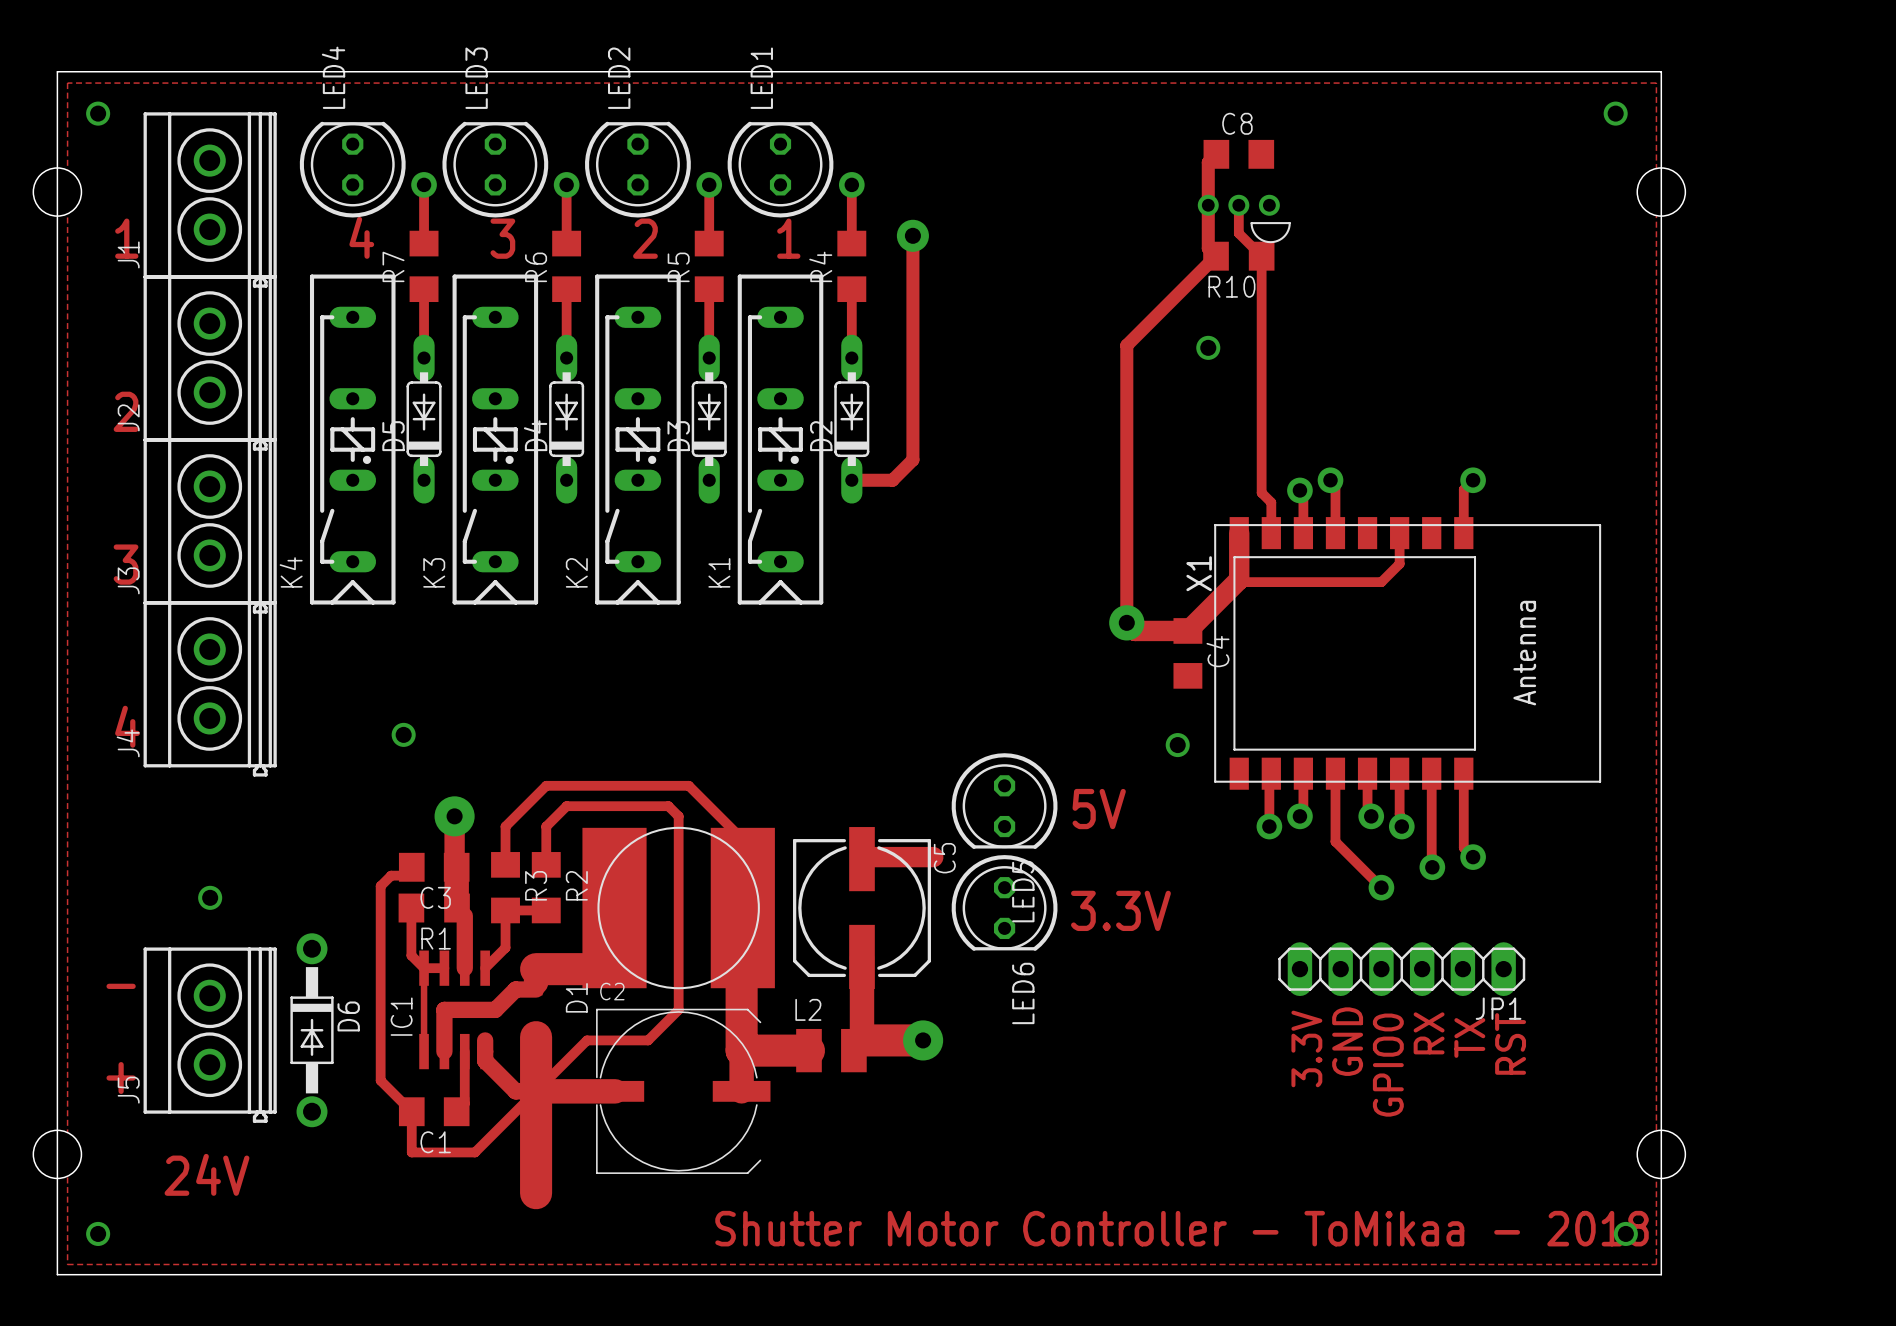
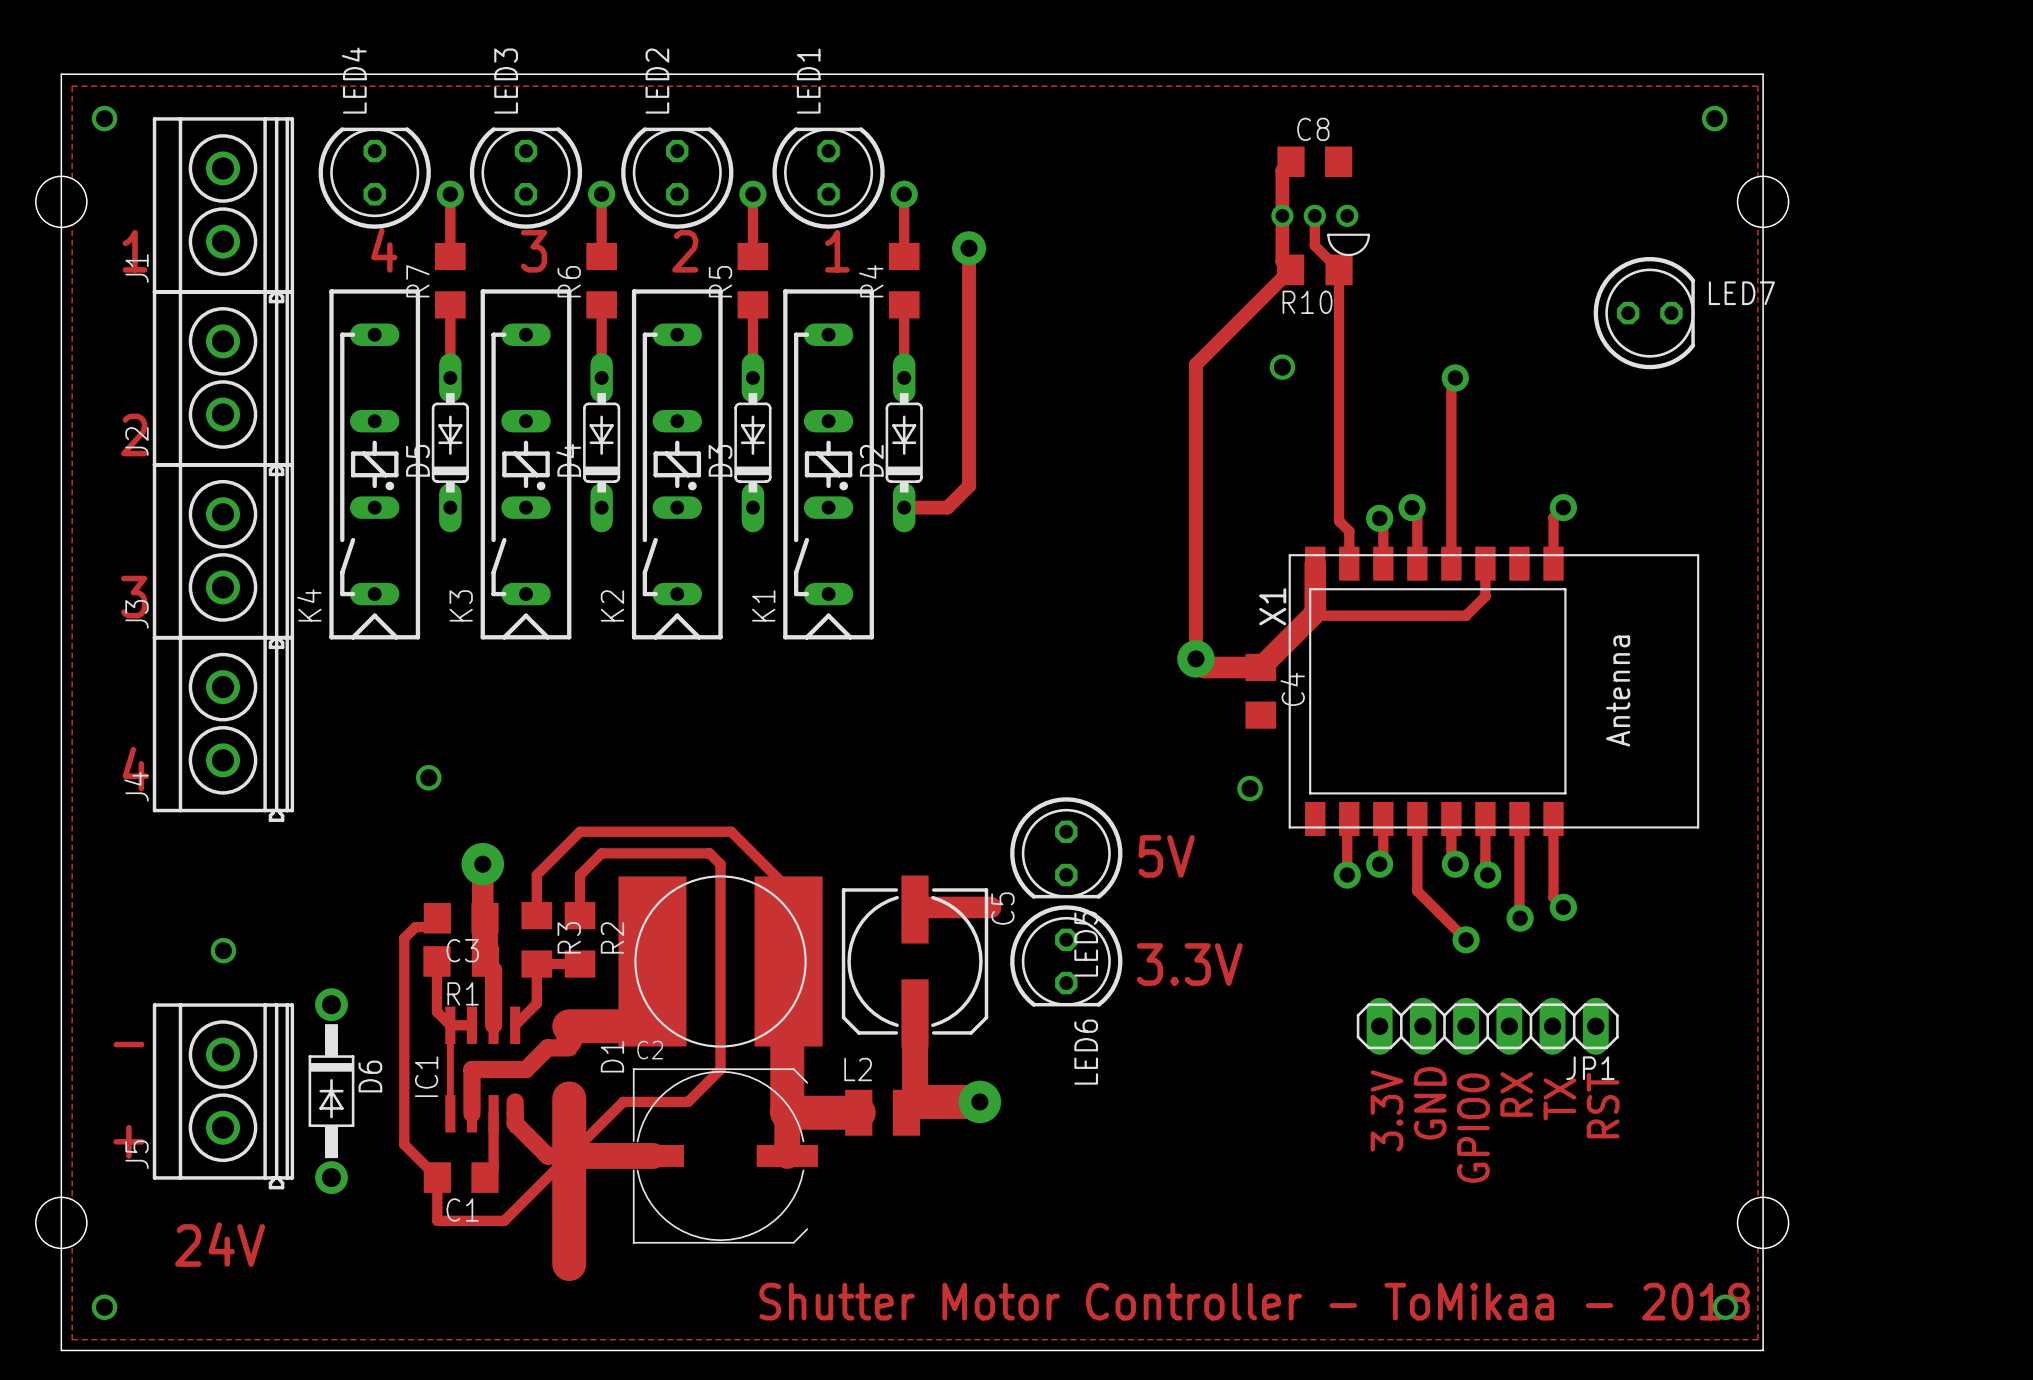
LED7: none -> (1644, 313)
track: none -> (1455, 377) (1451, 381) (1451, 563)
via: none -> (1455, 377)

